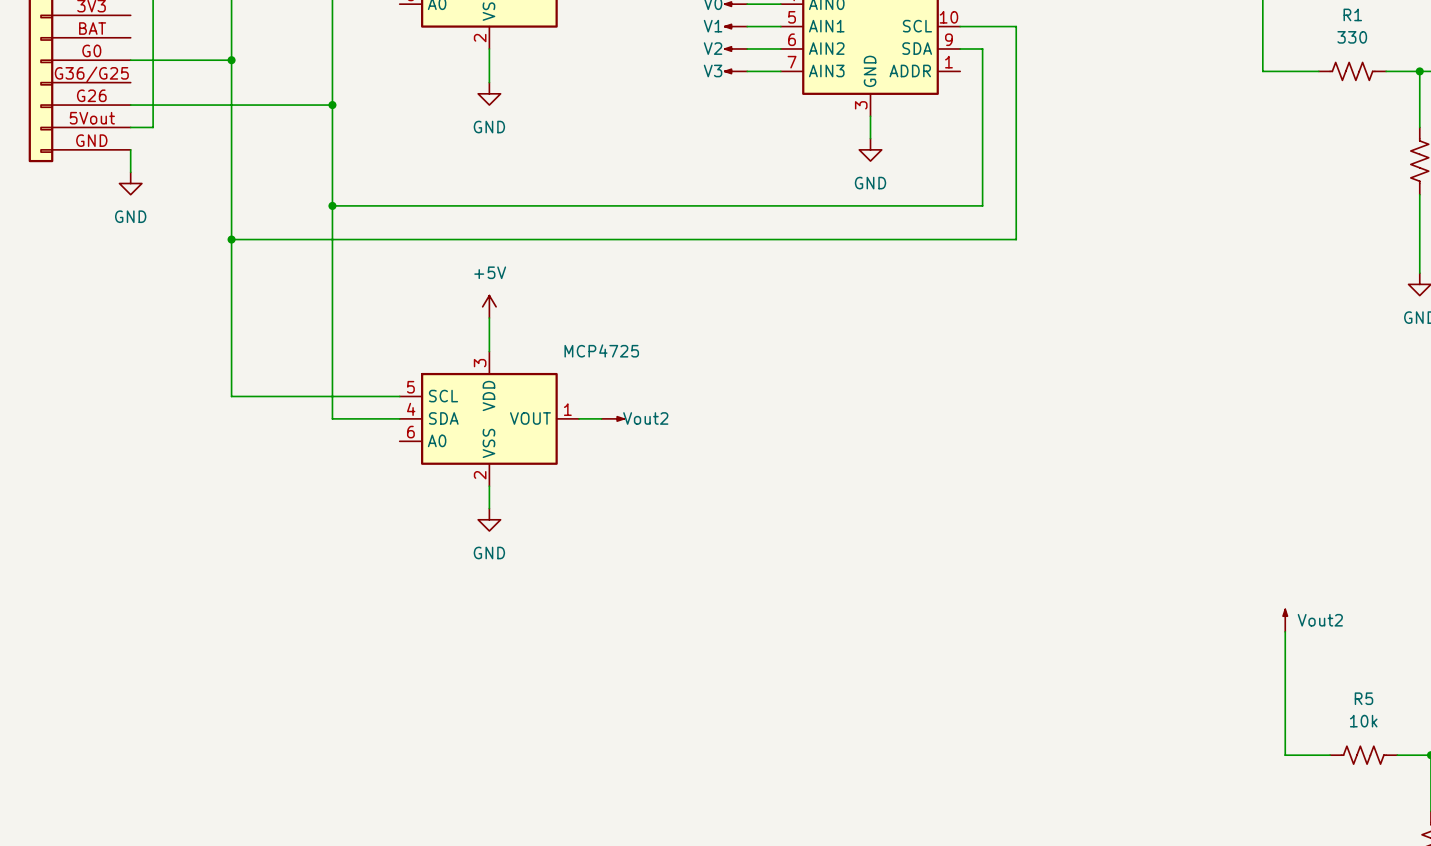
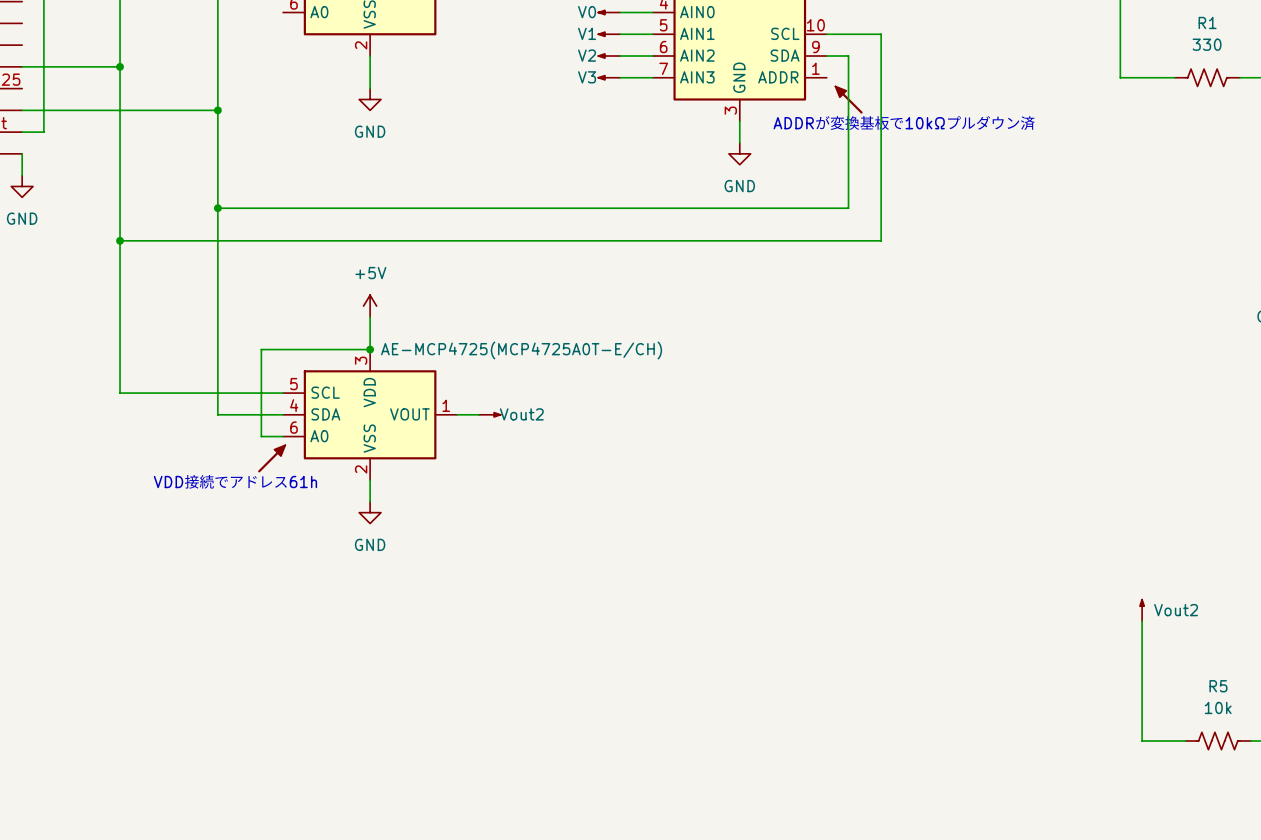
power symbol: none -> (849, 100)
text: none -> ADDRが変換基板で10kΩプルダウン済 (904, 123)
part value: MCP4725 (601, 350) -> AE-MCP4725(MCP4725A0T-E/CH) (521, 350)
wire: none -> (370, 349) (261, 349) (261, 436) (283, 436)
junction: none -> (370, 349)
power symbol: none -> (271, 458)
text: none -> VDD接続でアドレス61h (235, 481)

